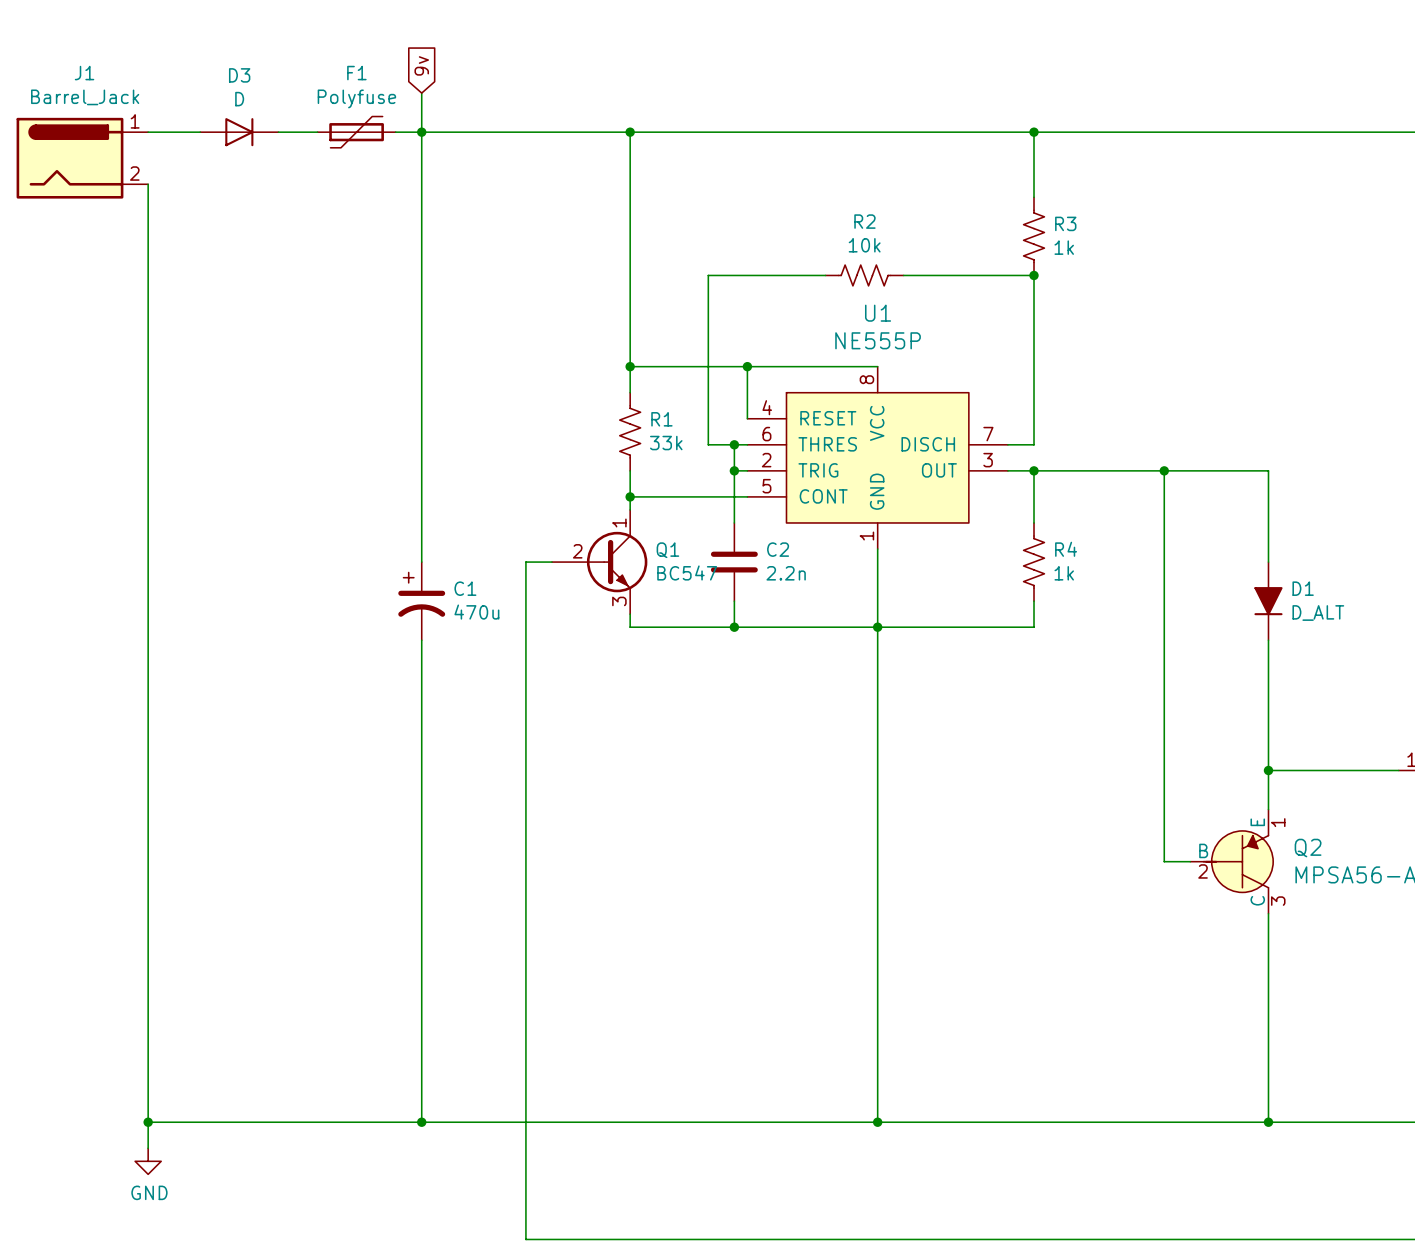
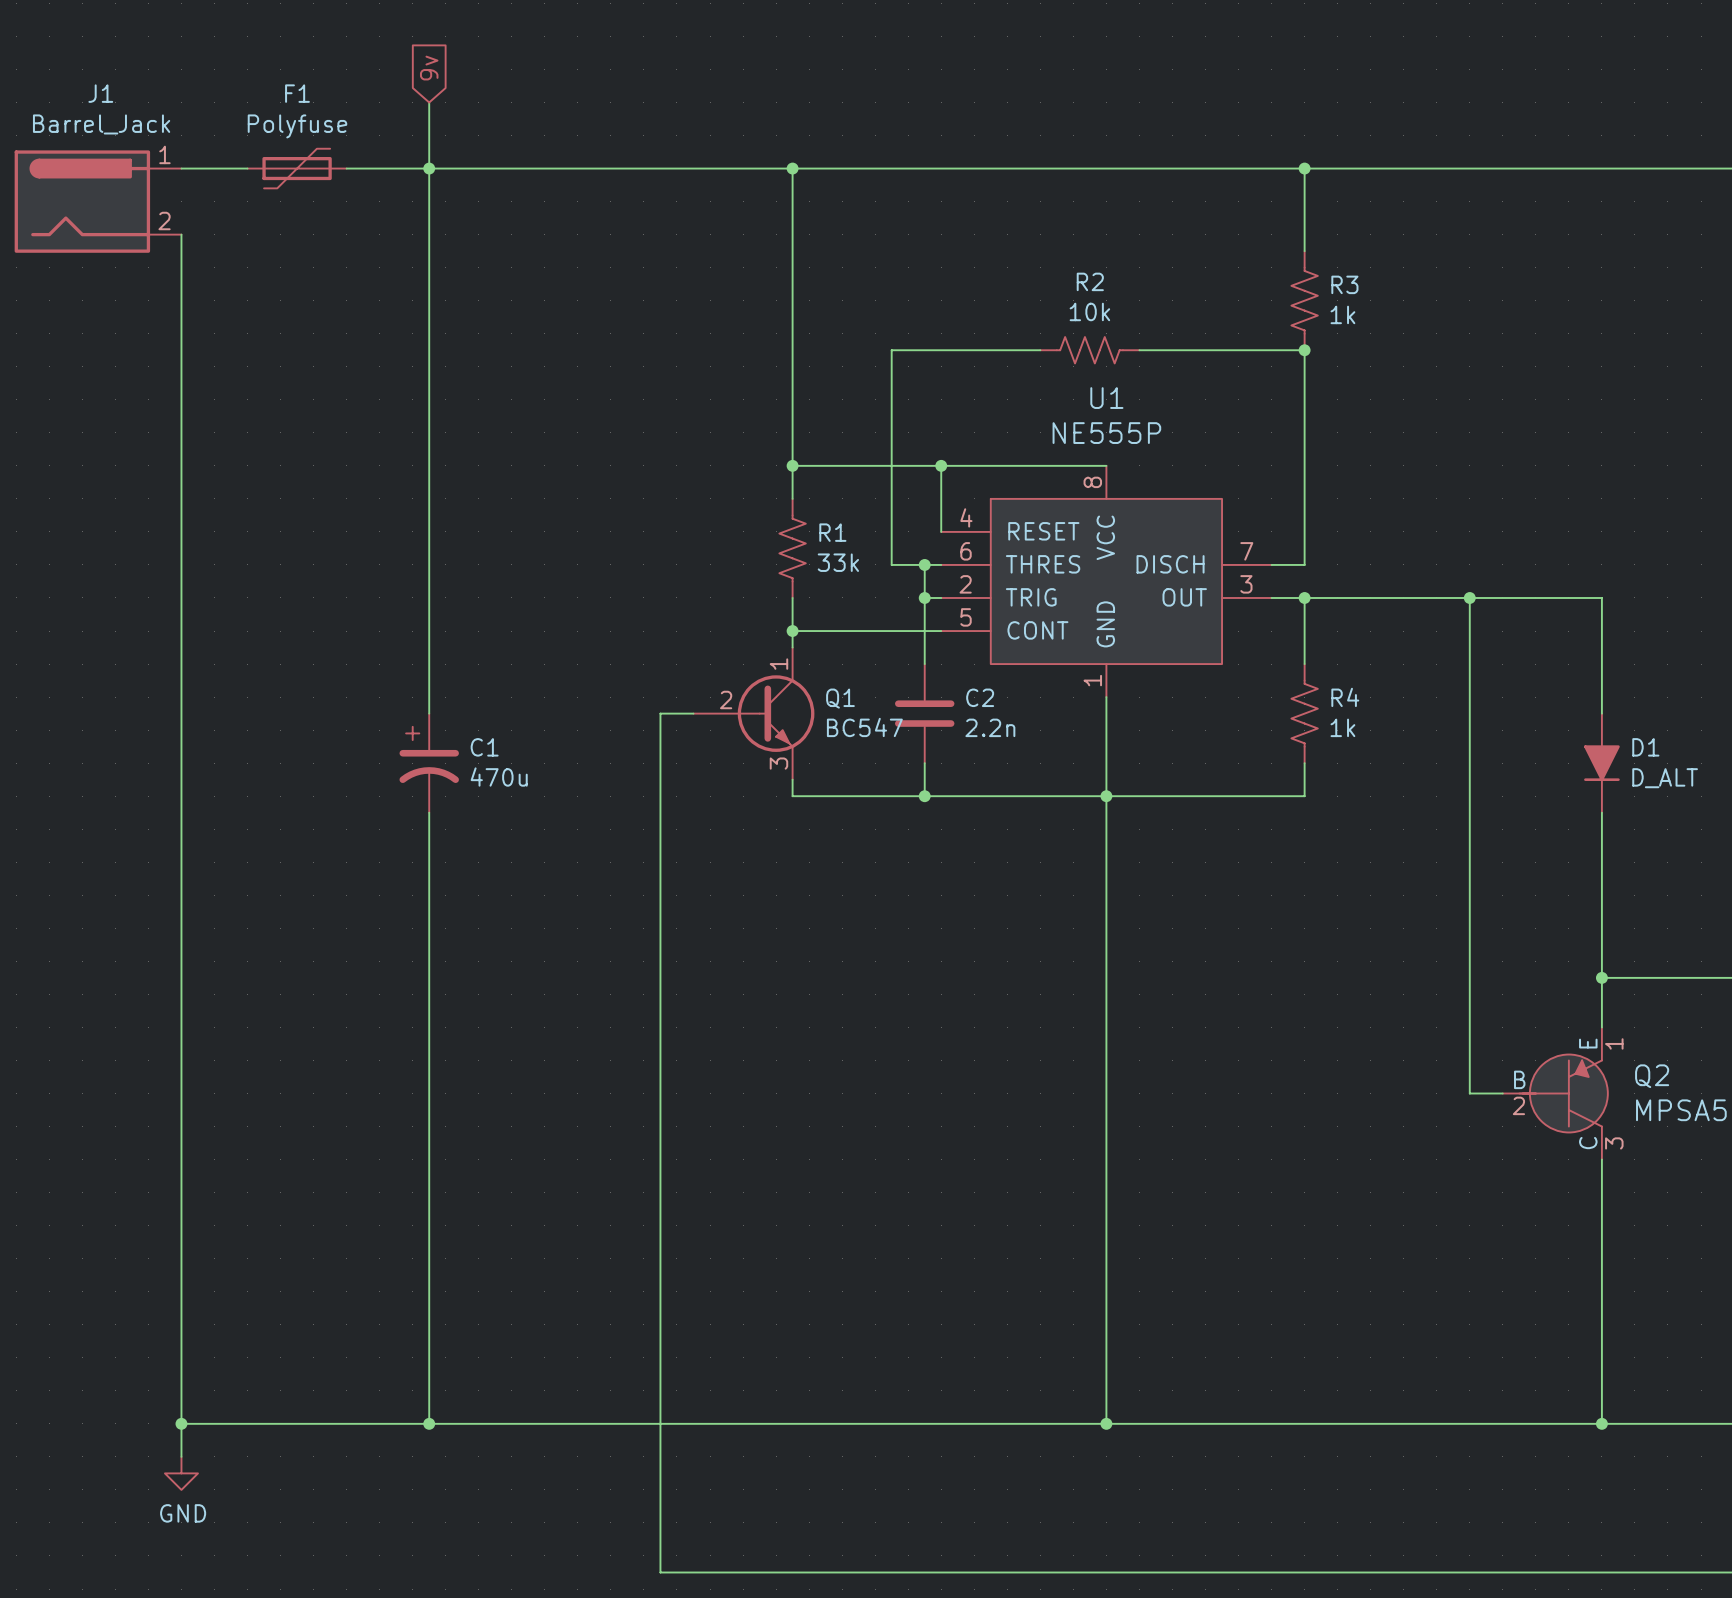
global label position: 9v (421, 65) -> 9v (429, 68)
wire: none -> (429, 102) (429, 713)
wire: (421, 93) (421, 562) -> none
D3: D (239, 132) -> none
junction: none -> (429, 168)
F1 position: (356, 132) -> (297, 168)
junction: (421, 132) -> none
C1 position: (421, 601) -> (429, 763)
wire: (421, 640) (421, 1122) -> (429, 812) (429, 1423)
junction: none -> (429, 1423)
junction: (421, 1122) -> none

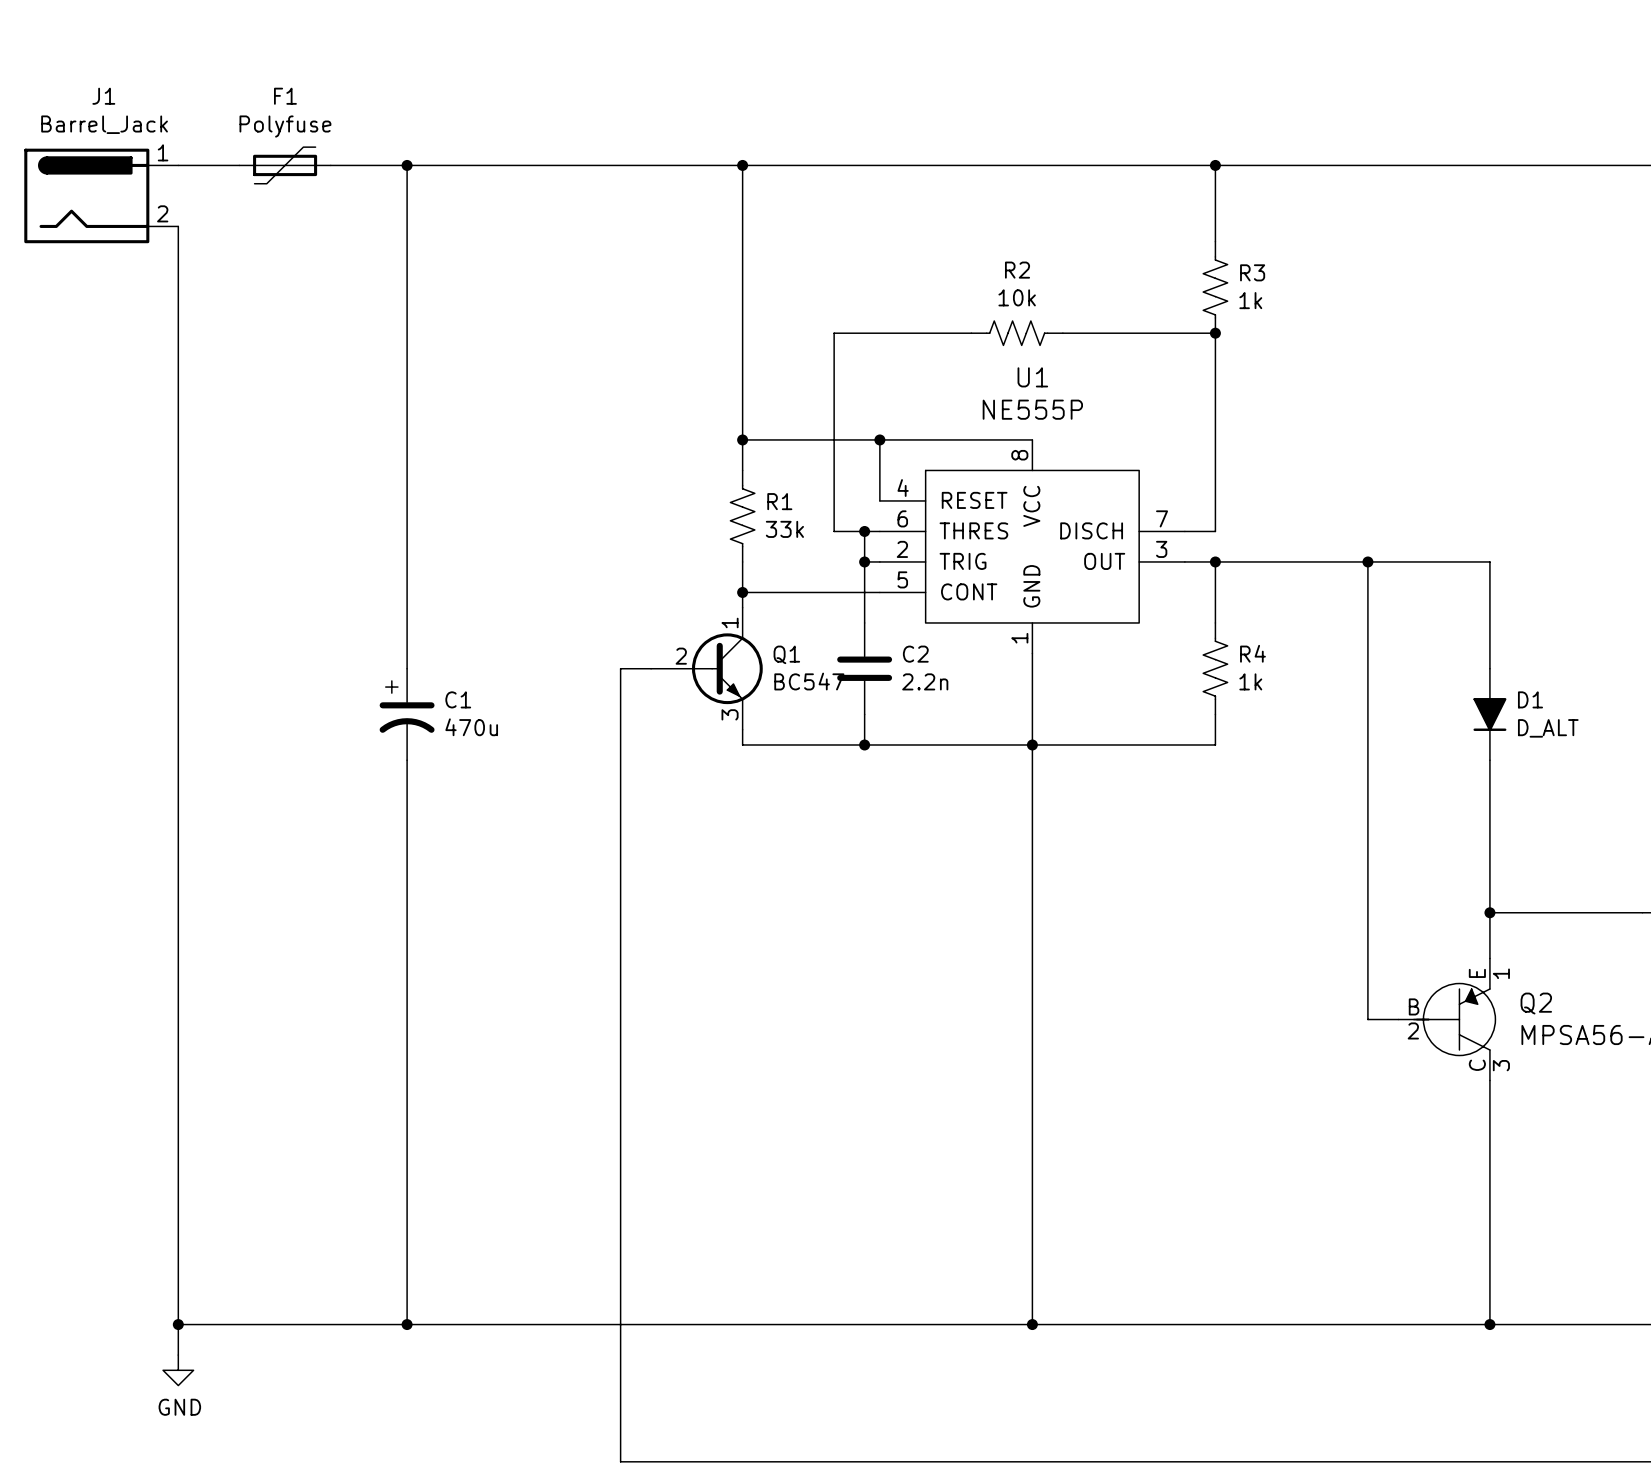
global label: 9v (429, 68) -> none
wire: (429, 102) (429, 168) -> none

